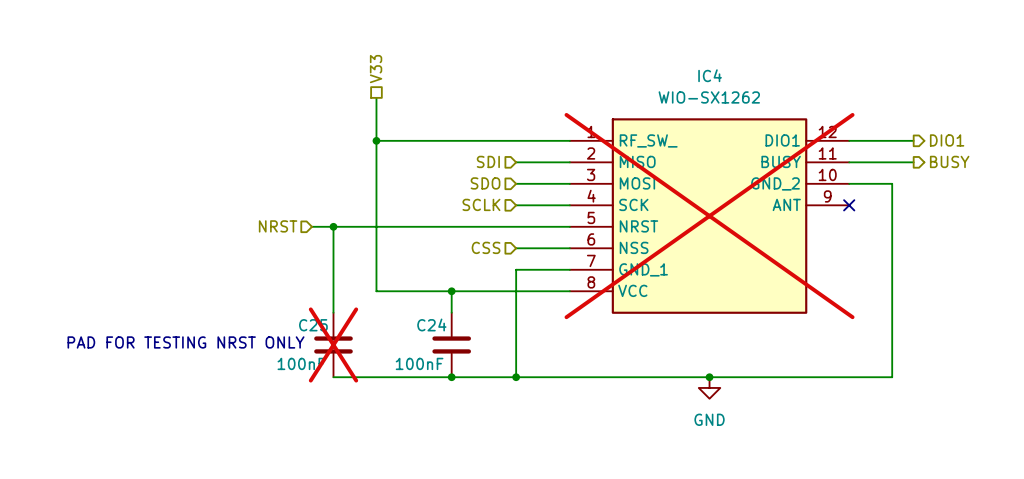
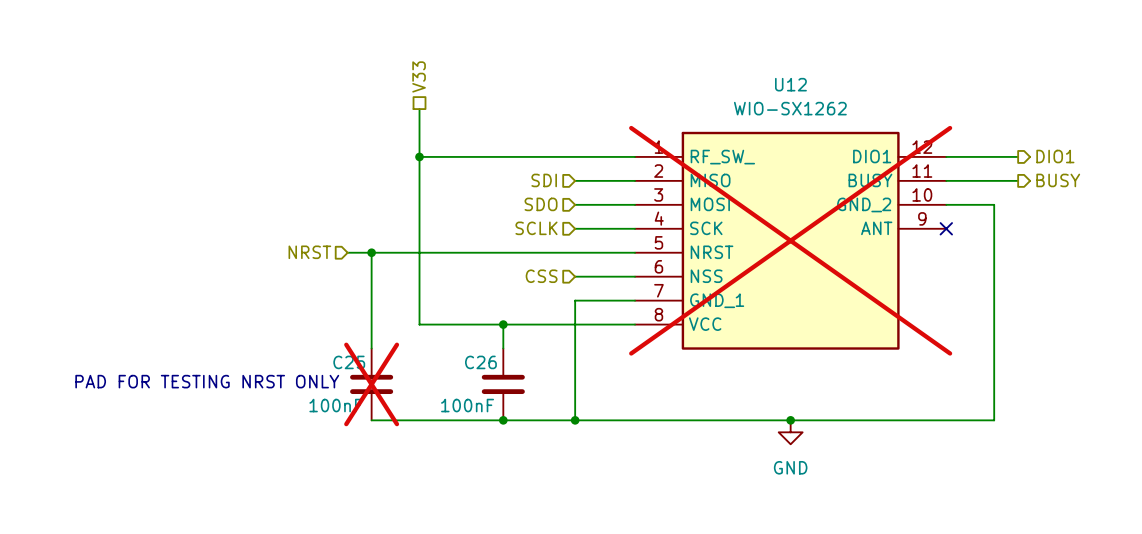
IC4 name: IC4 (710, 75) -> U12 (790, 84)
C24 name: C24 (431, 324) -> C26 (480, 362)

